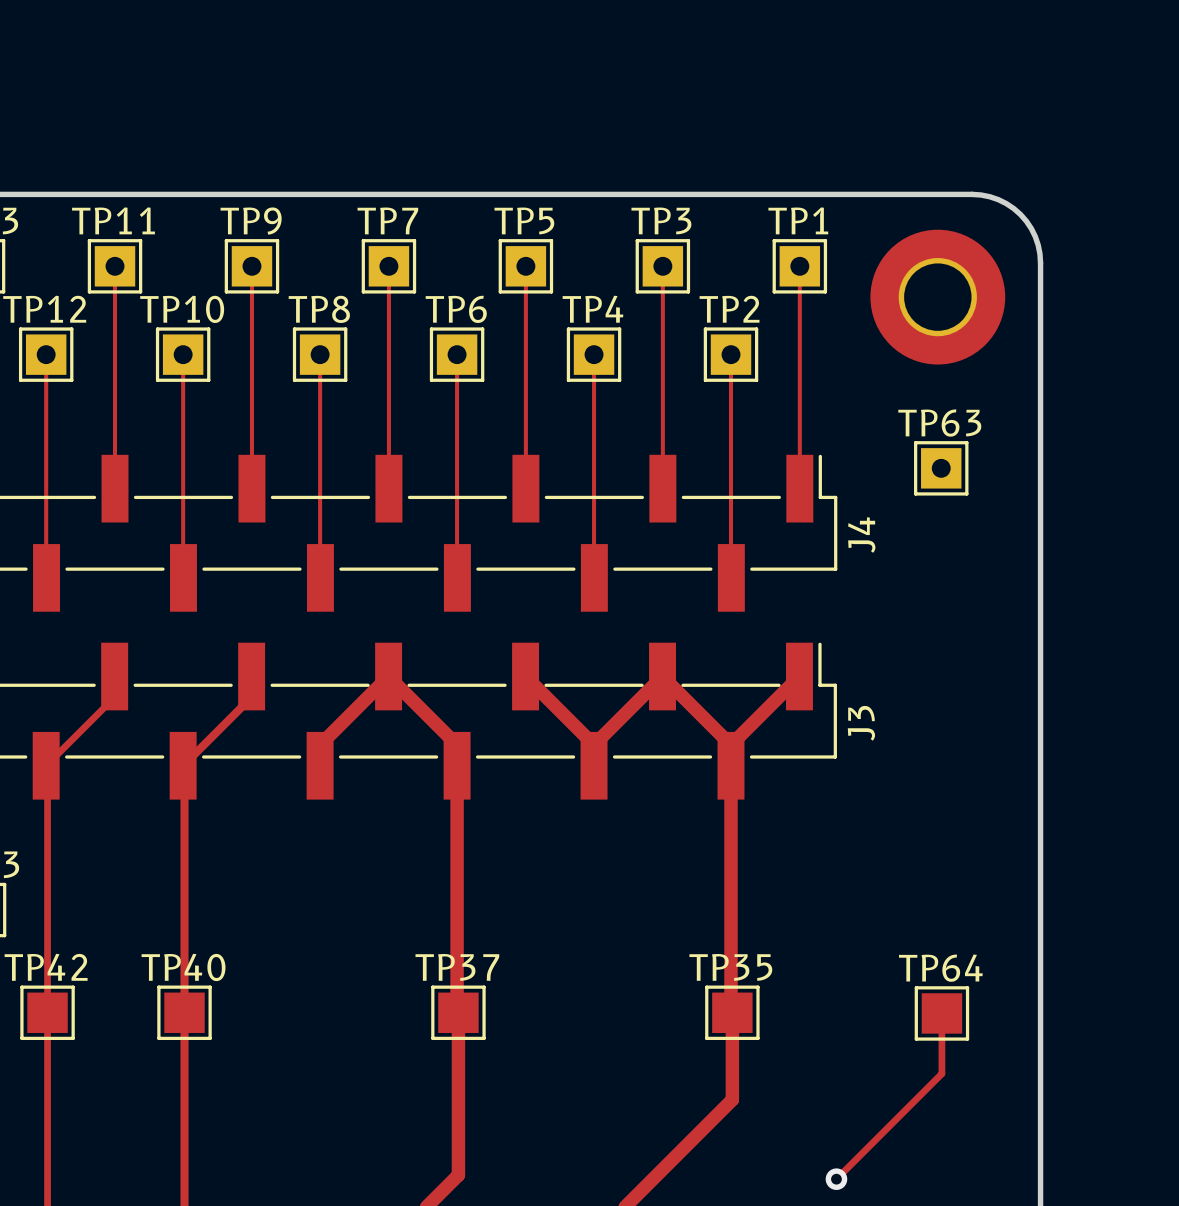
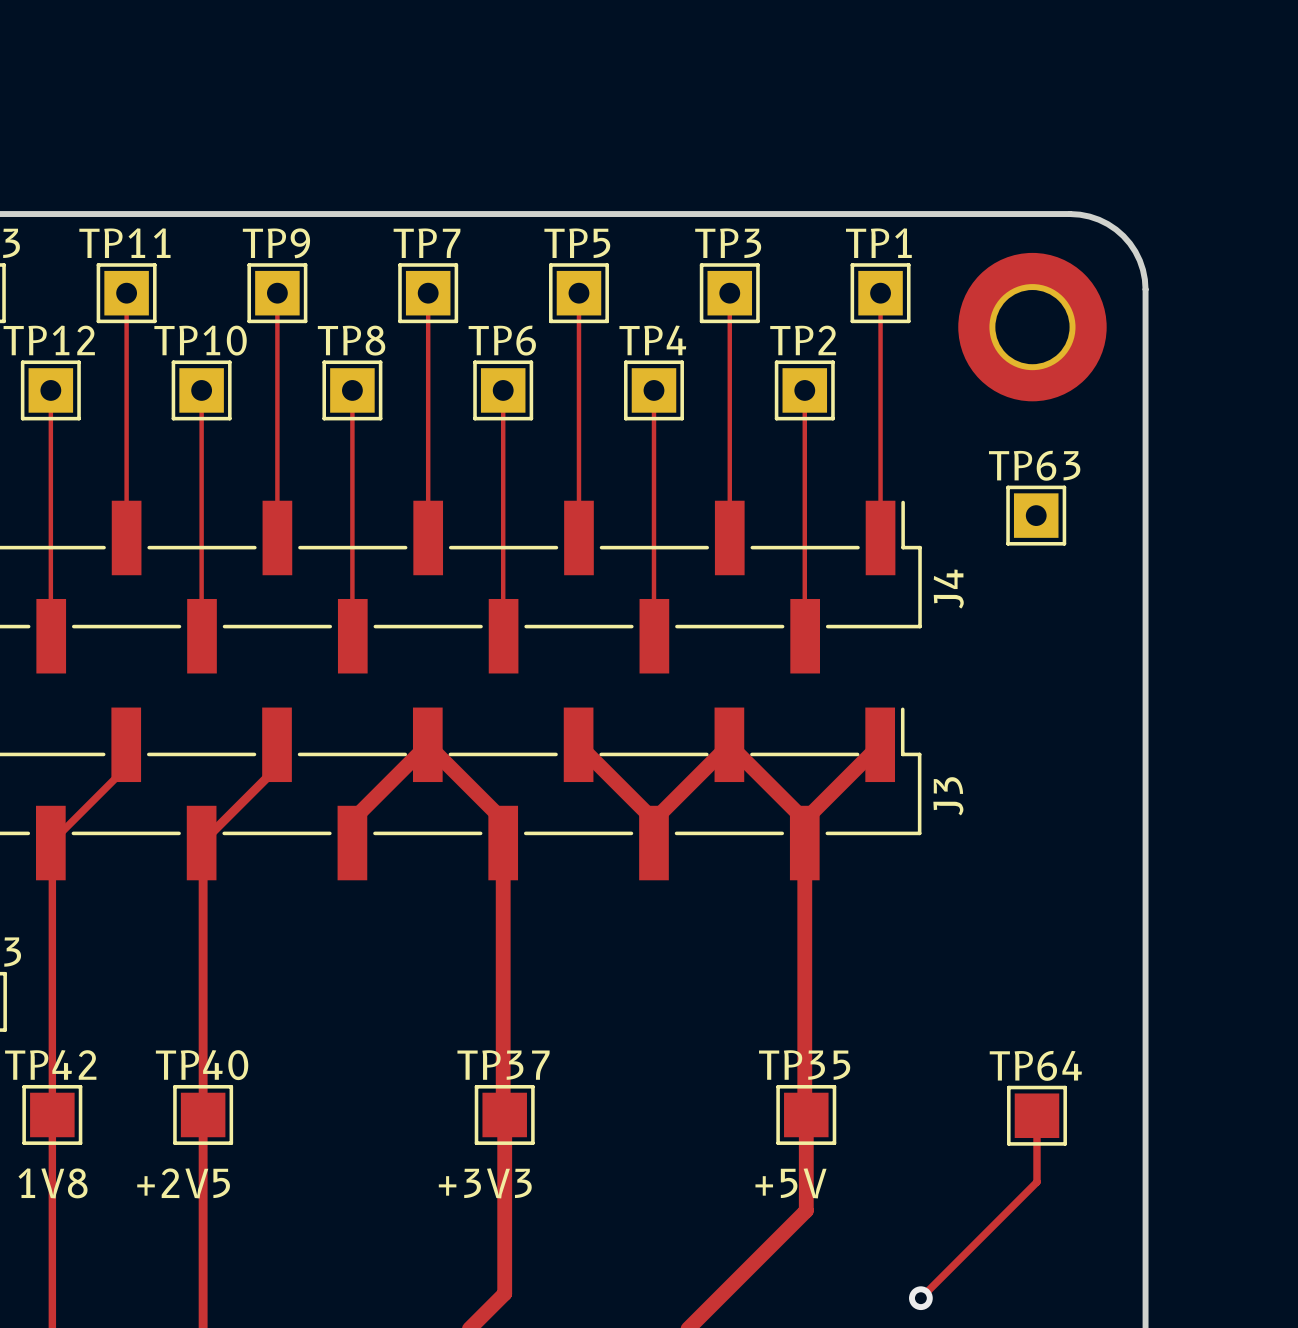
text: none -> 1V8 (53, 1183)
text: none -> +2V5 (183, 1183)
text: none -> +3V3 (485, 1183)
text: none -> +5V (791, 1183)

